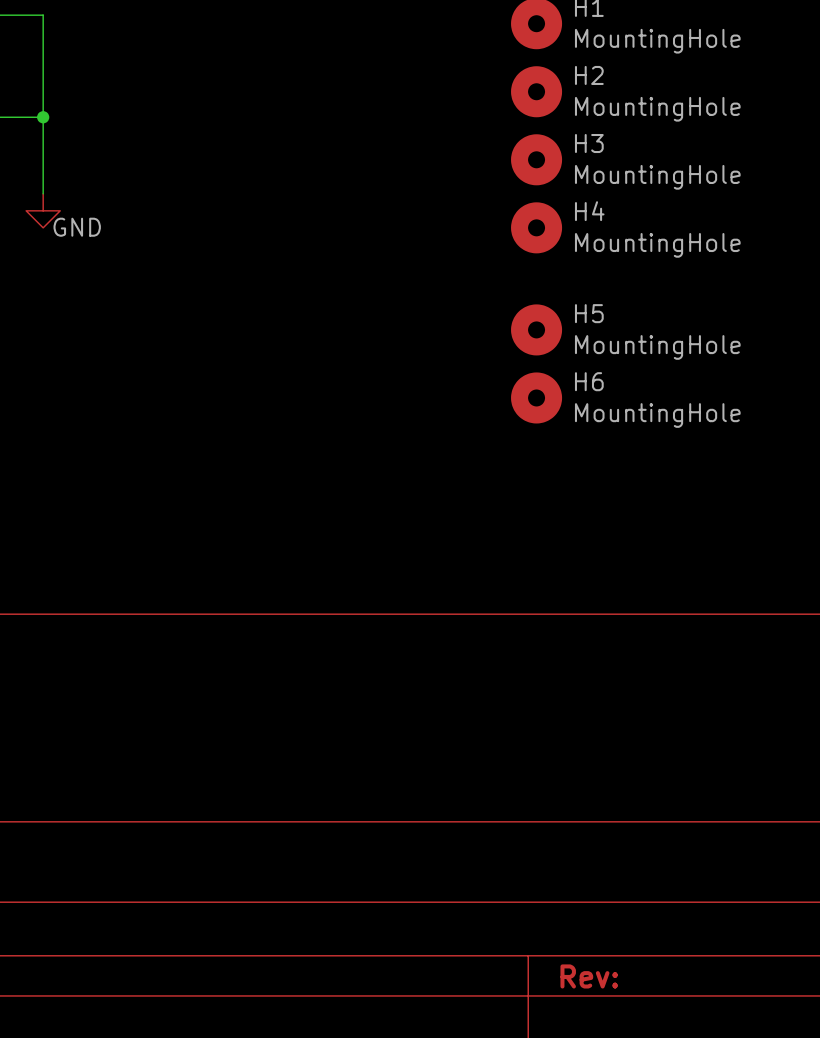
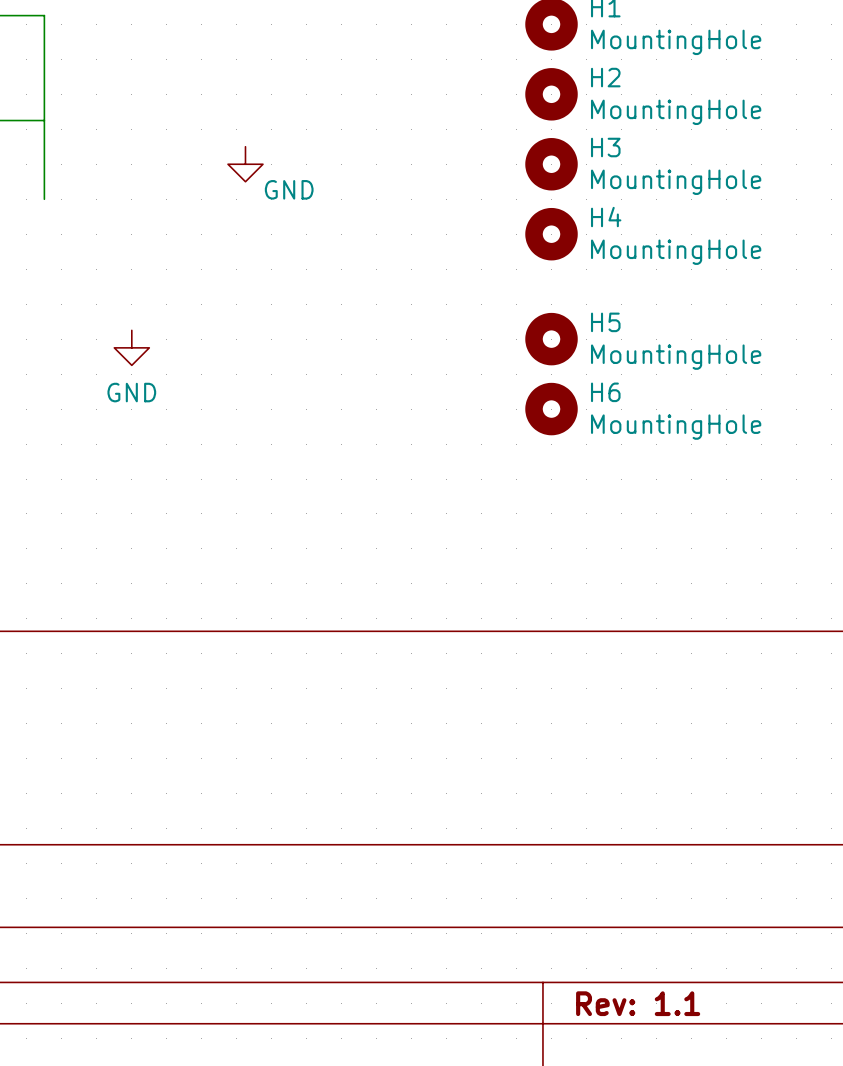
junction: (43, 117) -> none
power symbol: none -> GND (245, 164)
power symbol: GND (43, 210) -> none
power symbol: none -> GND (131, 347)
title block: Rev: (589, 976) -> Rev: 1.1 (638, 1003)

